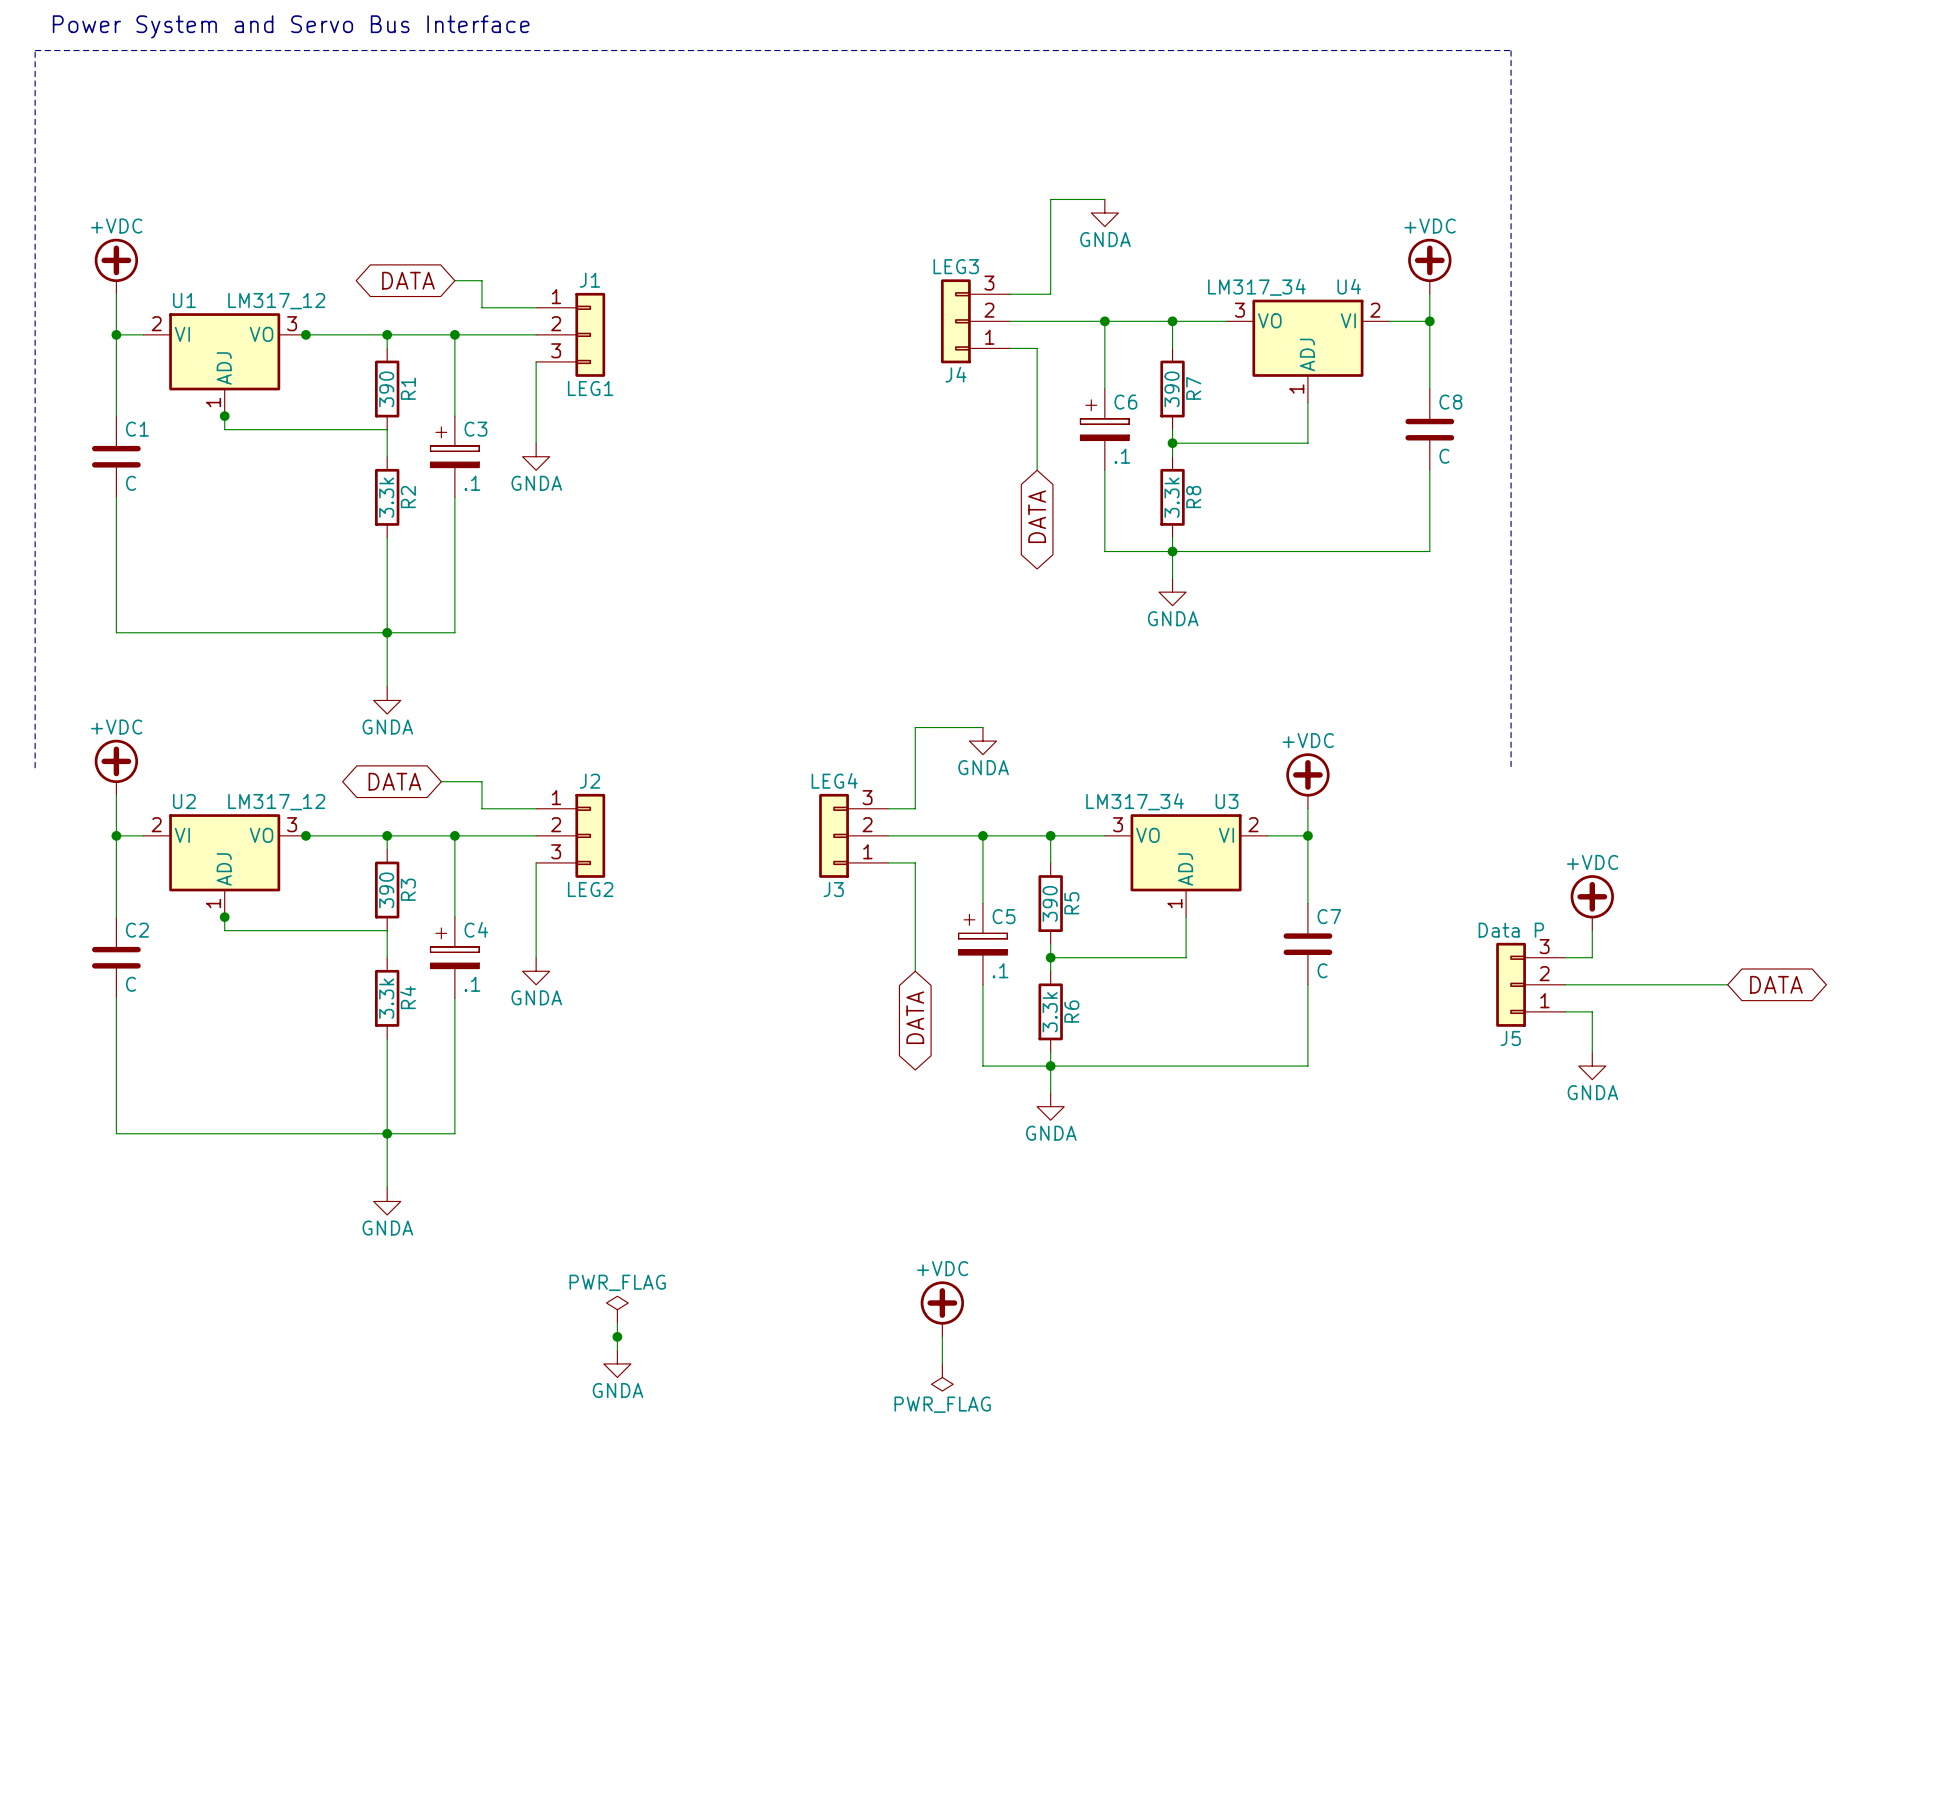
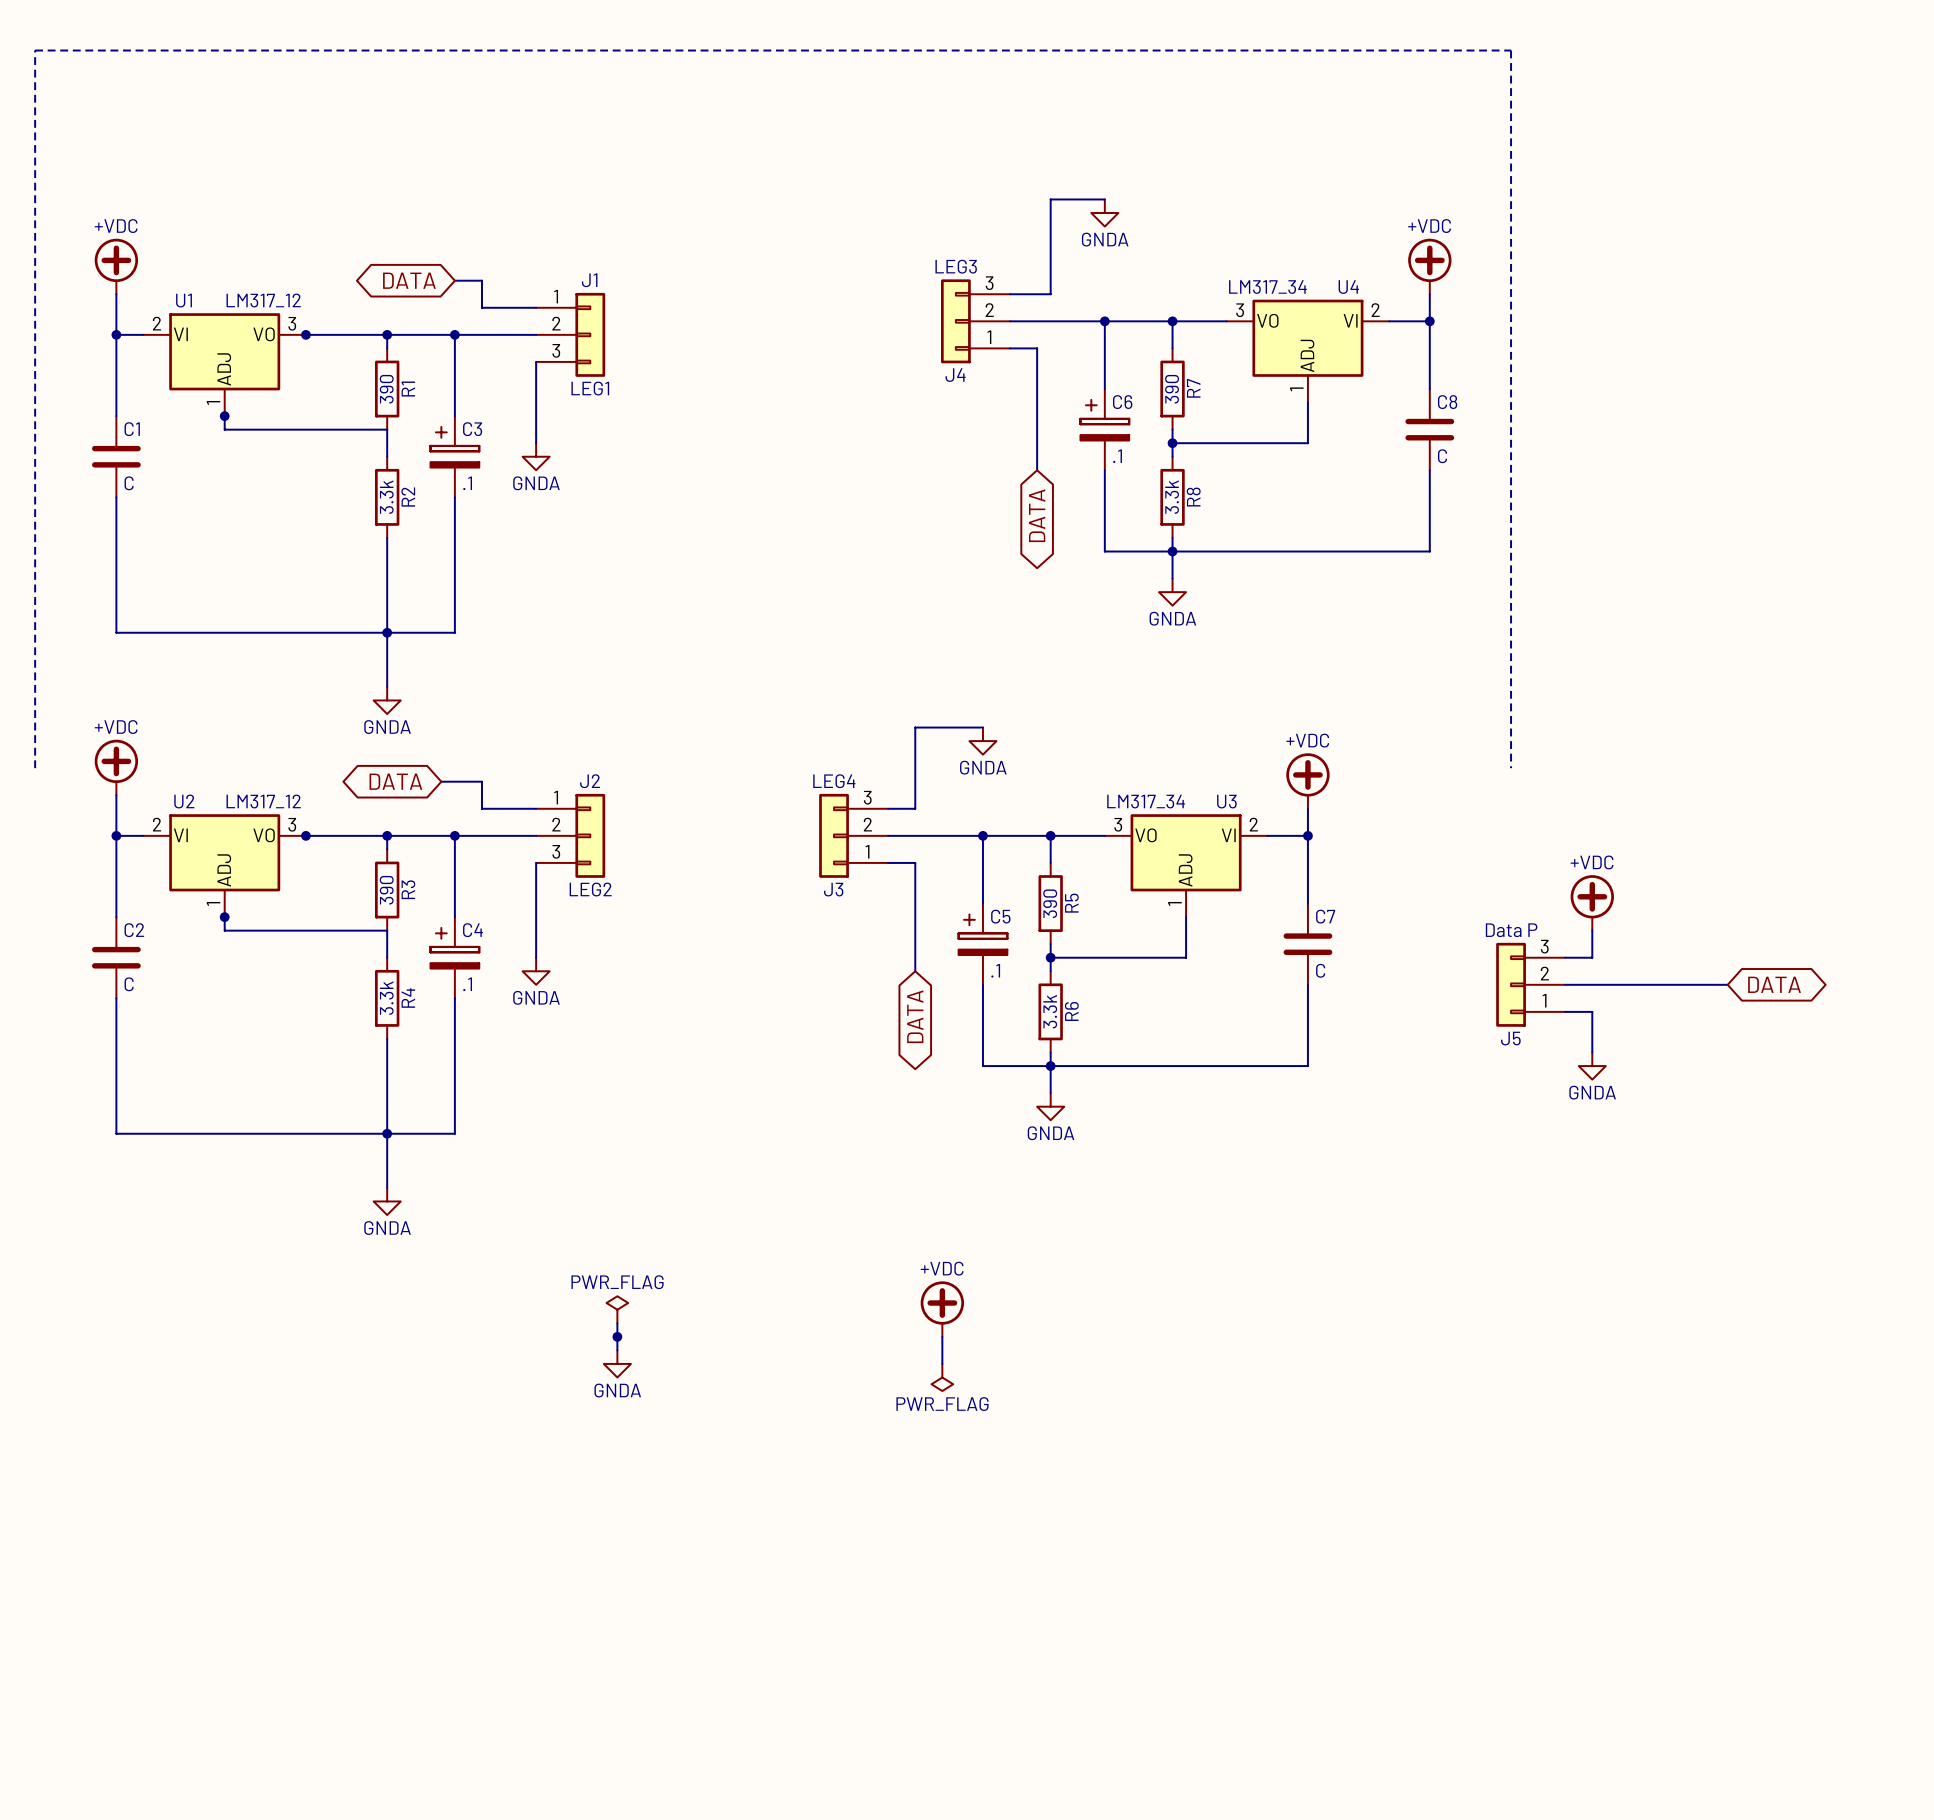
text: Power System and Servo Bus Interface (291, 26) -> none

